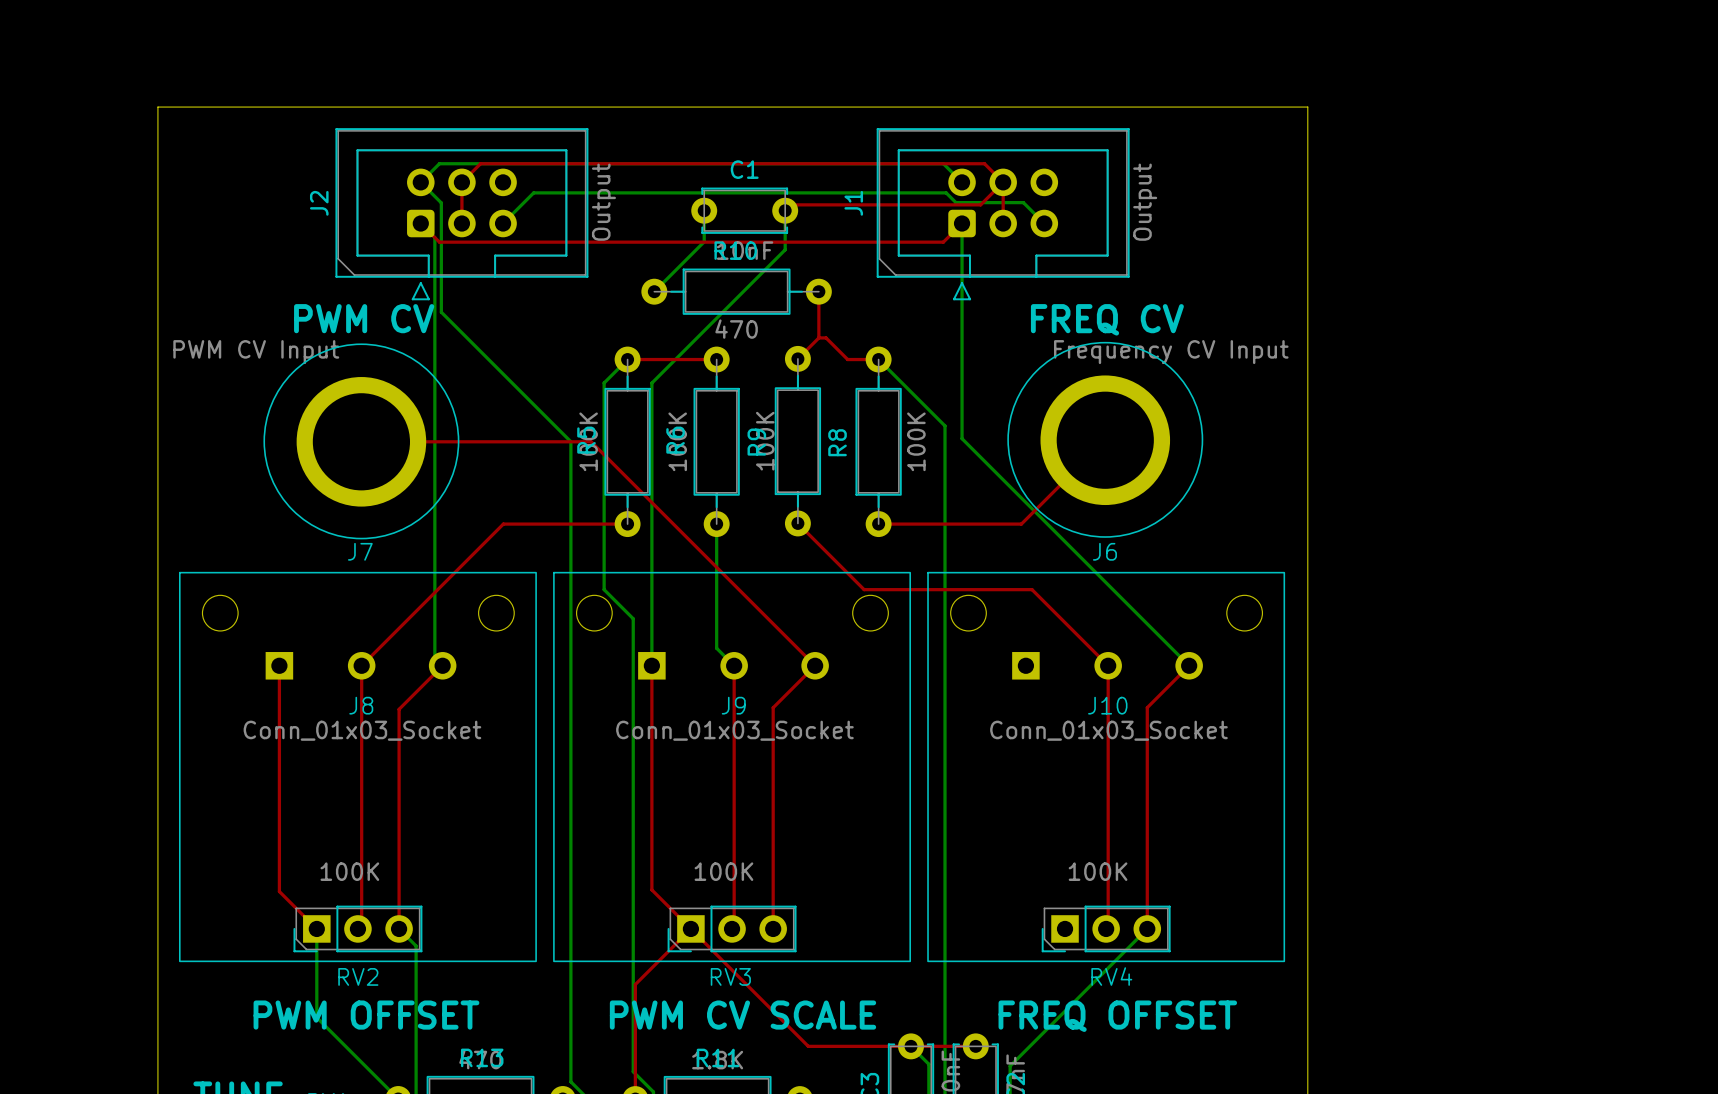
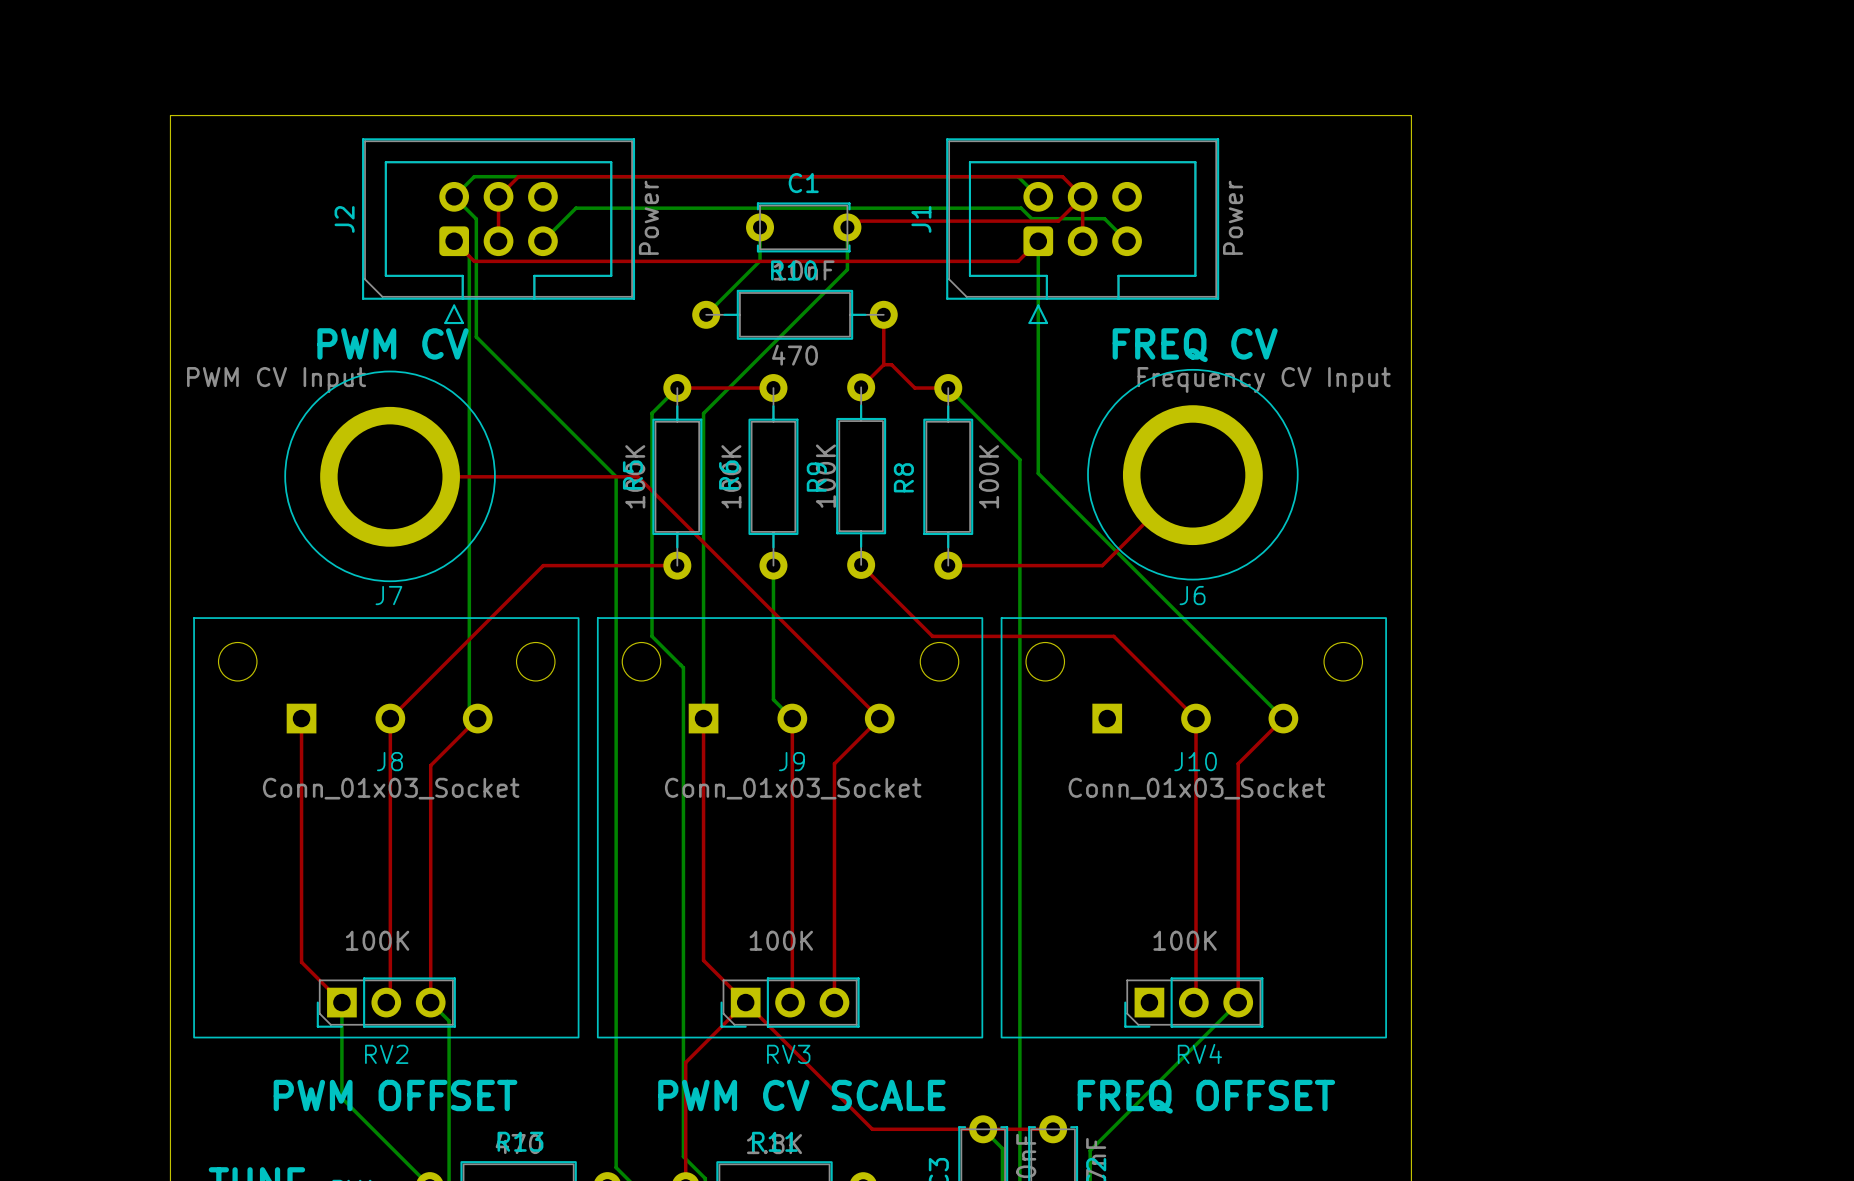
J2 value: Output (603, 202) -> Power (648, 217)
J1 value: Output (1145, 202) -> Power (1233, 217)

